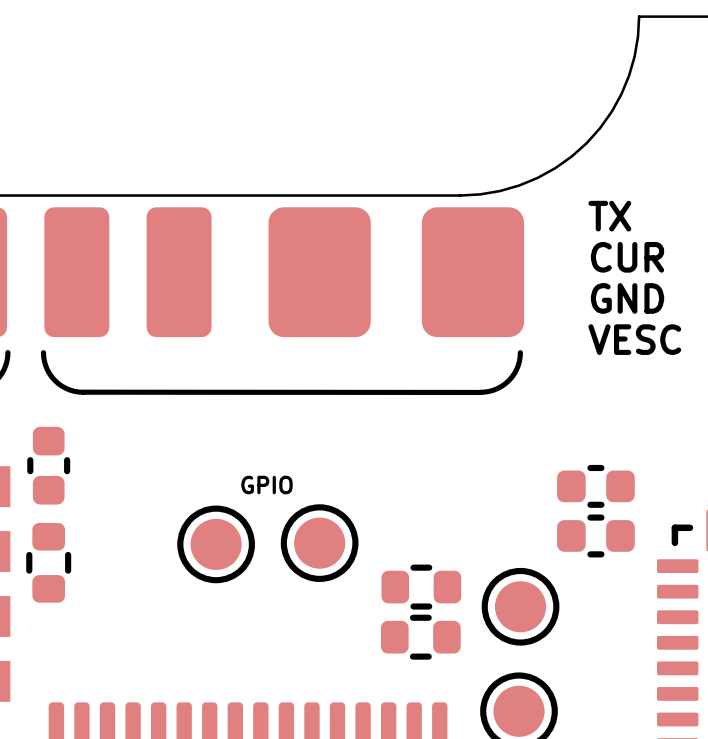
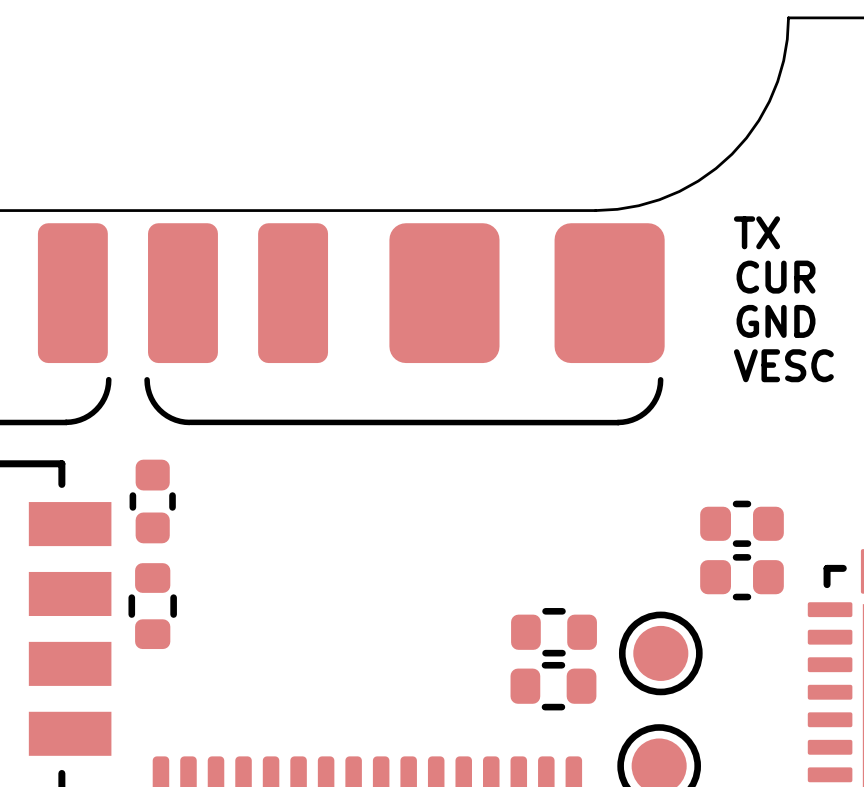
text: GPIO (266, 485) -> none
part: (319, 543) -> none
part: (216, 544) -> none

